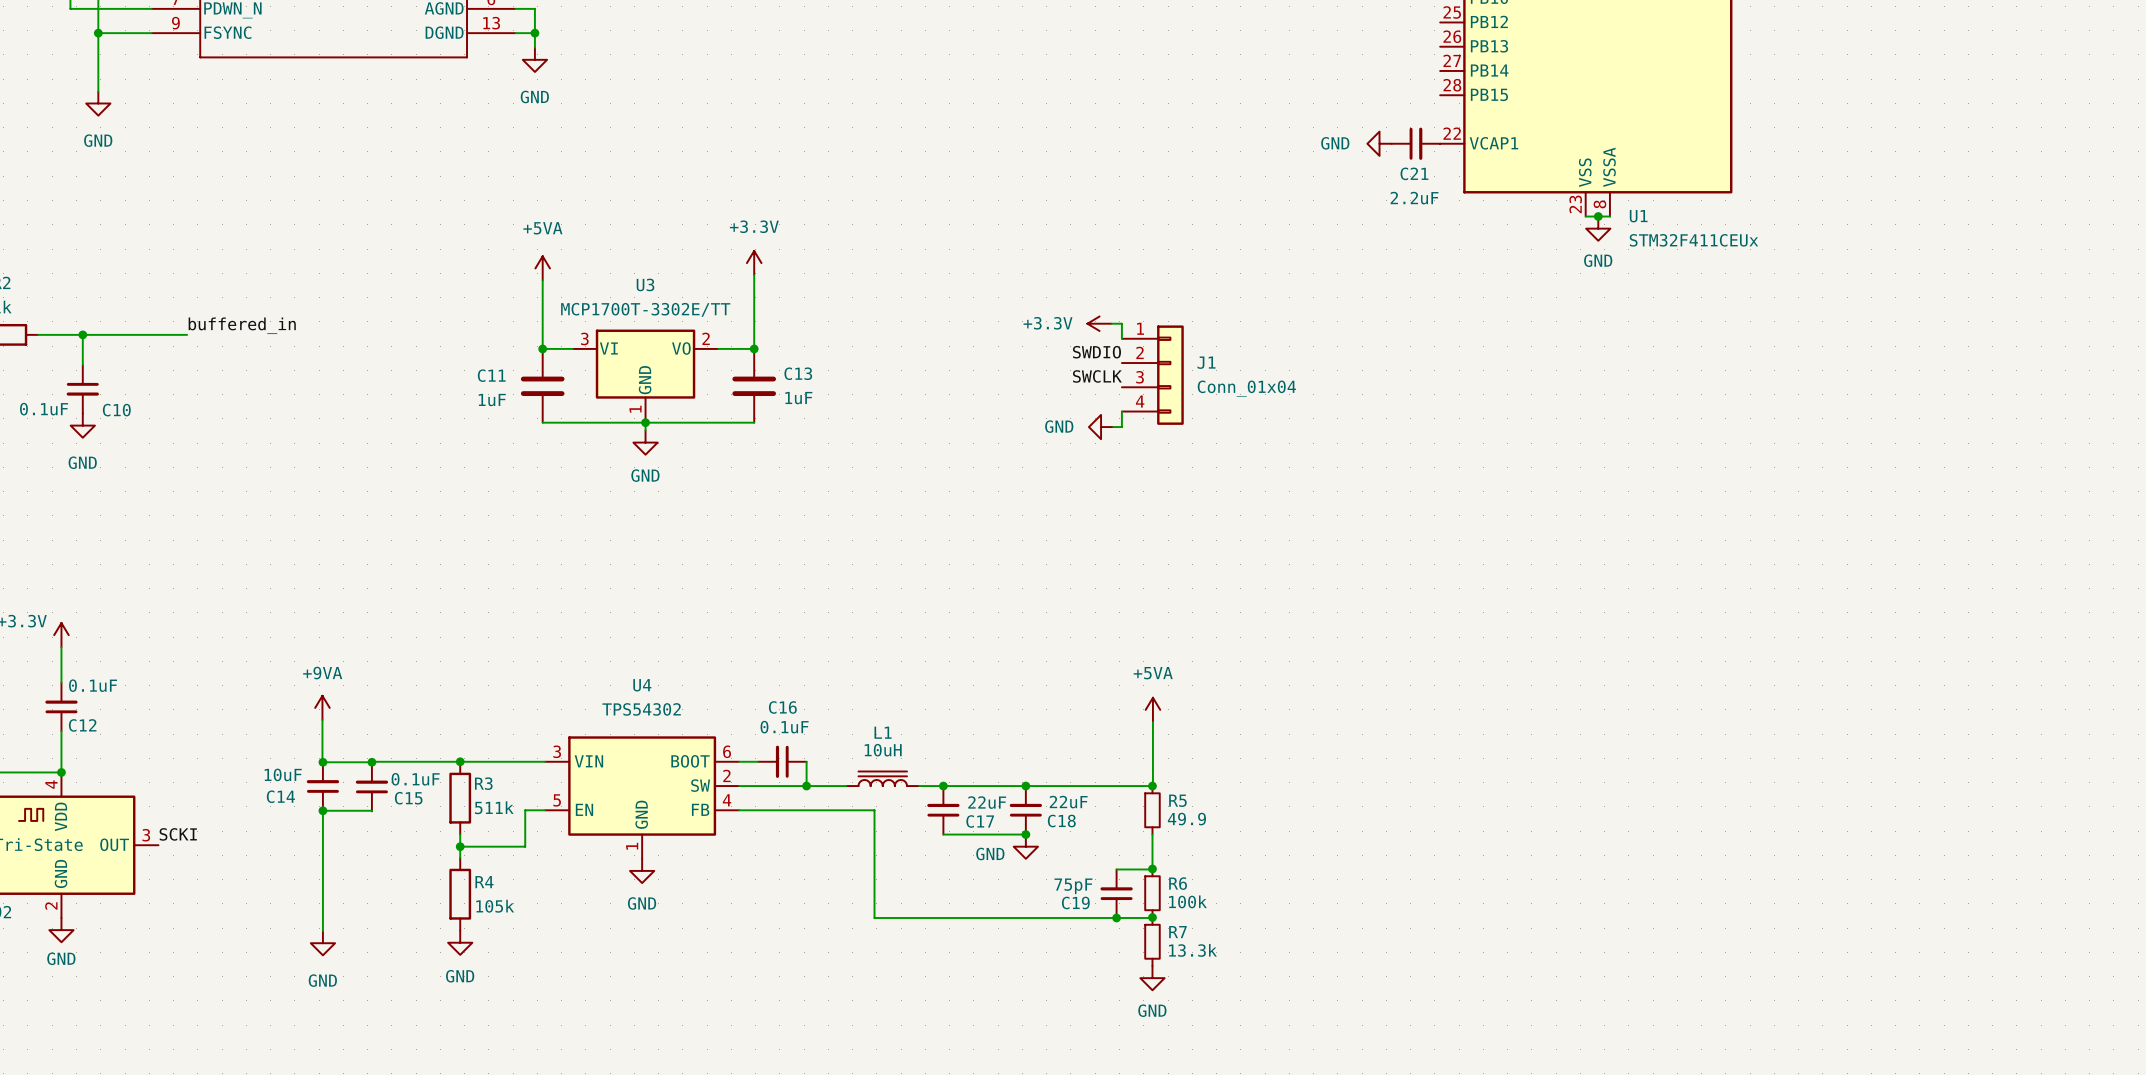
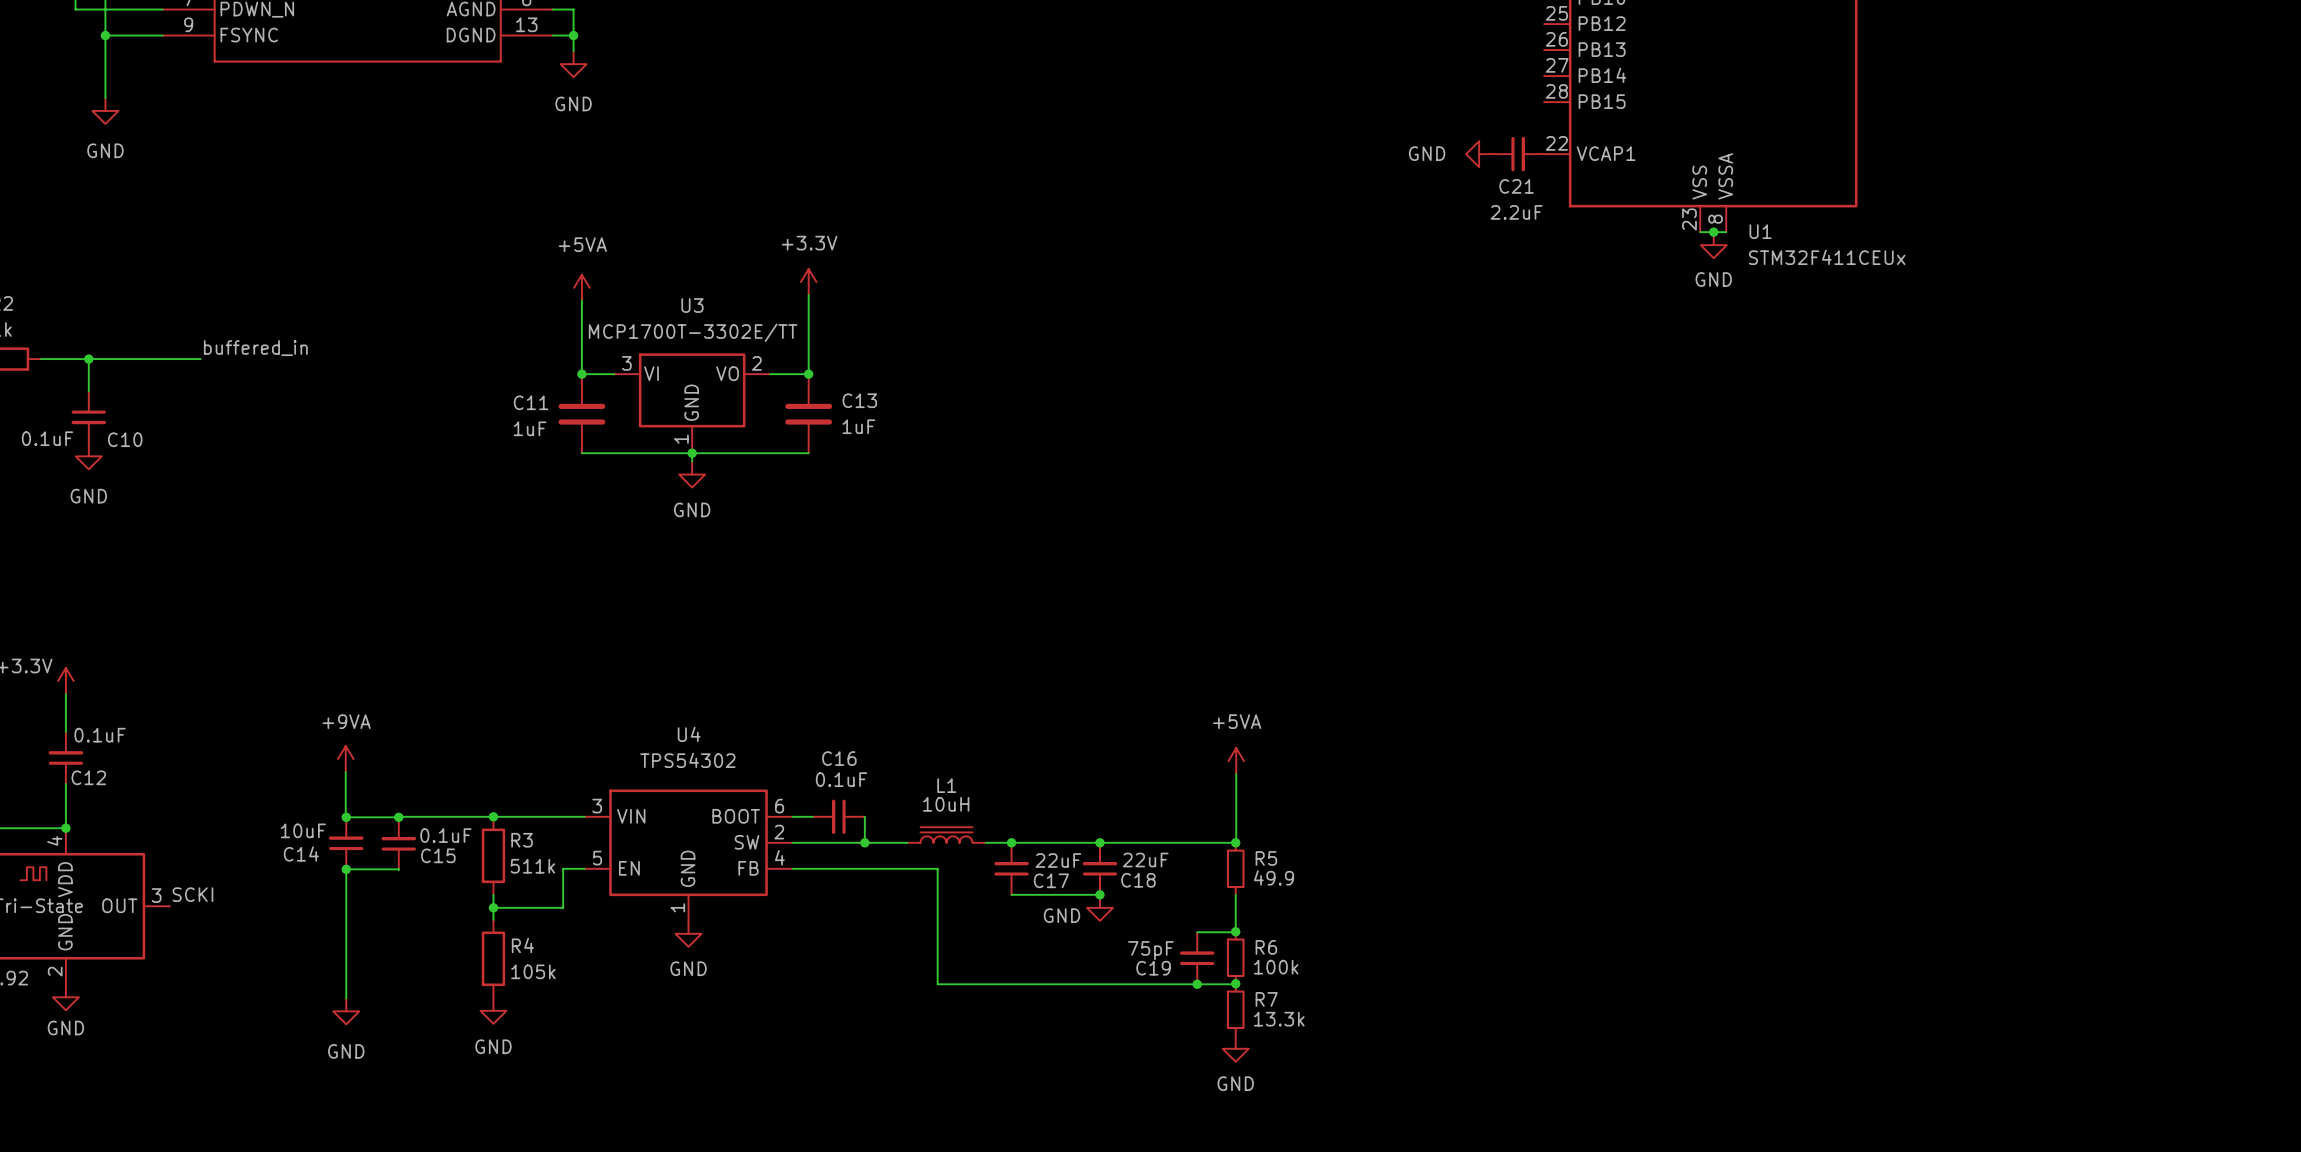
power symbol: +3.3V (1099, 323) -> none
wire: (1111, 323) (1121, 323) (1121, 338) -> none
label: SWDIO (1096, 352) -> none
J1: Conn_01x04 (1152, 375) -> none
label: SWCLK (1097, 376) -> none
wire: (1121, 411) (1121, 427) (1113, 427) -> none
power symbol: GND (1101, 427) -> none

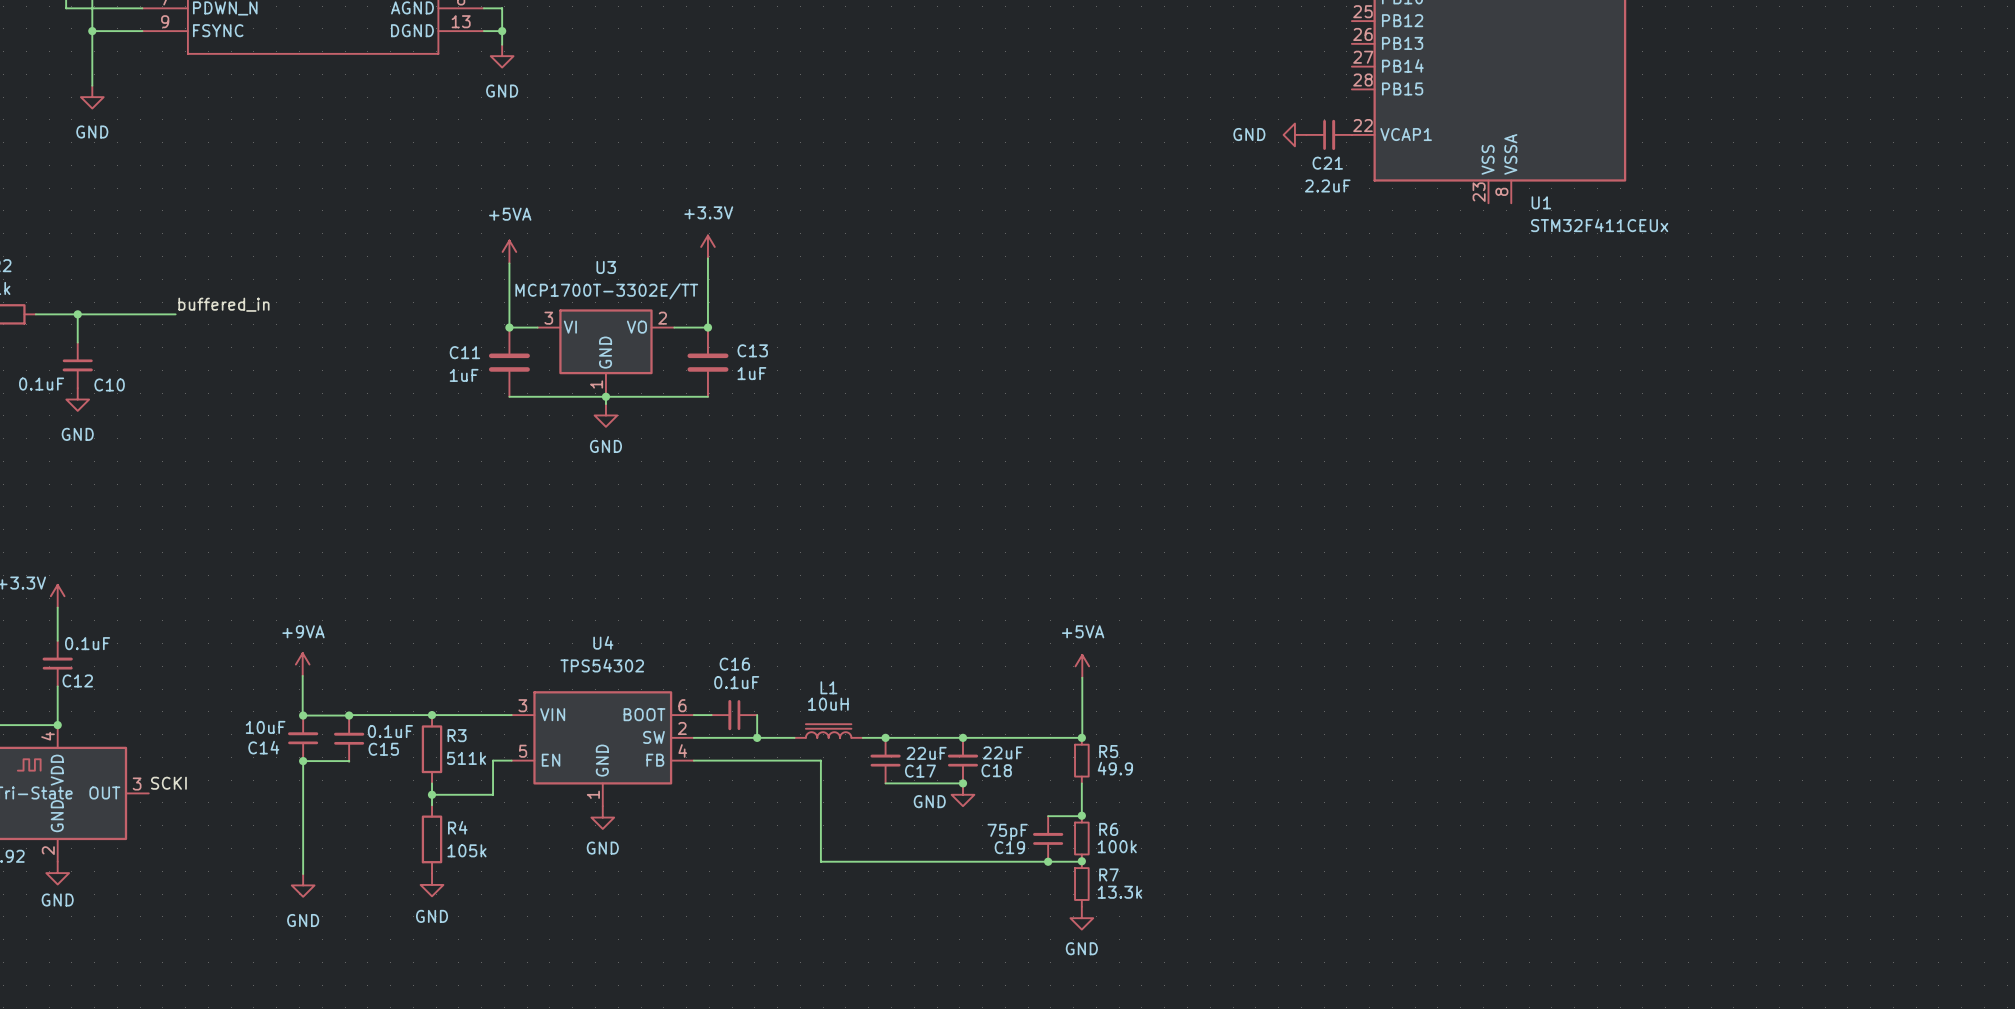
wire: (1700, 232) (1726, 232) -> none
junction: (1713, 232) -> none
power symbol: GND (1713, 245) -> none

